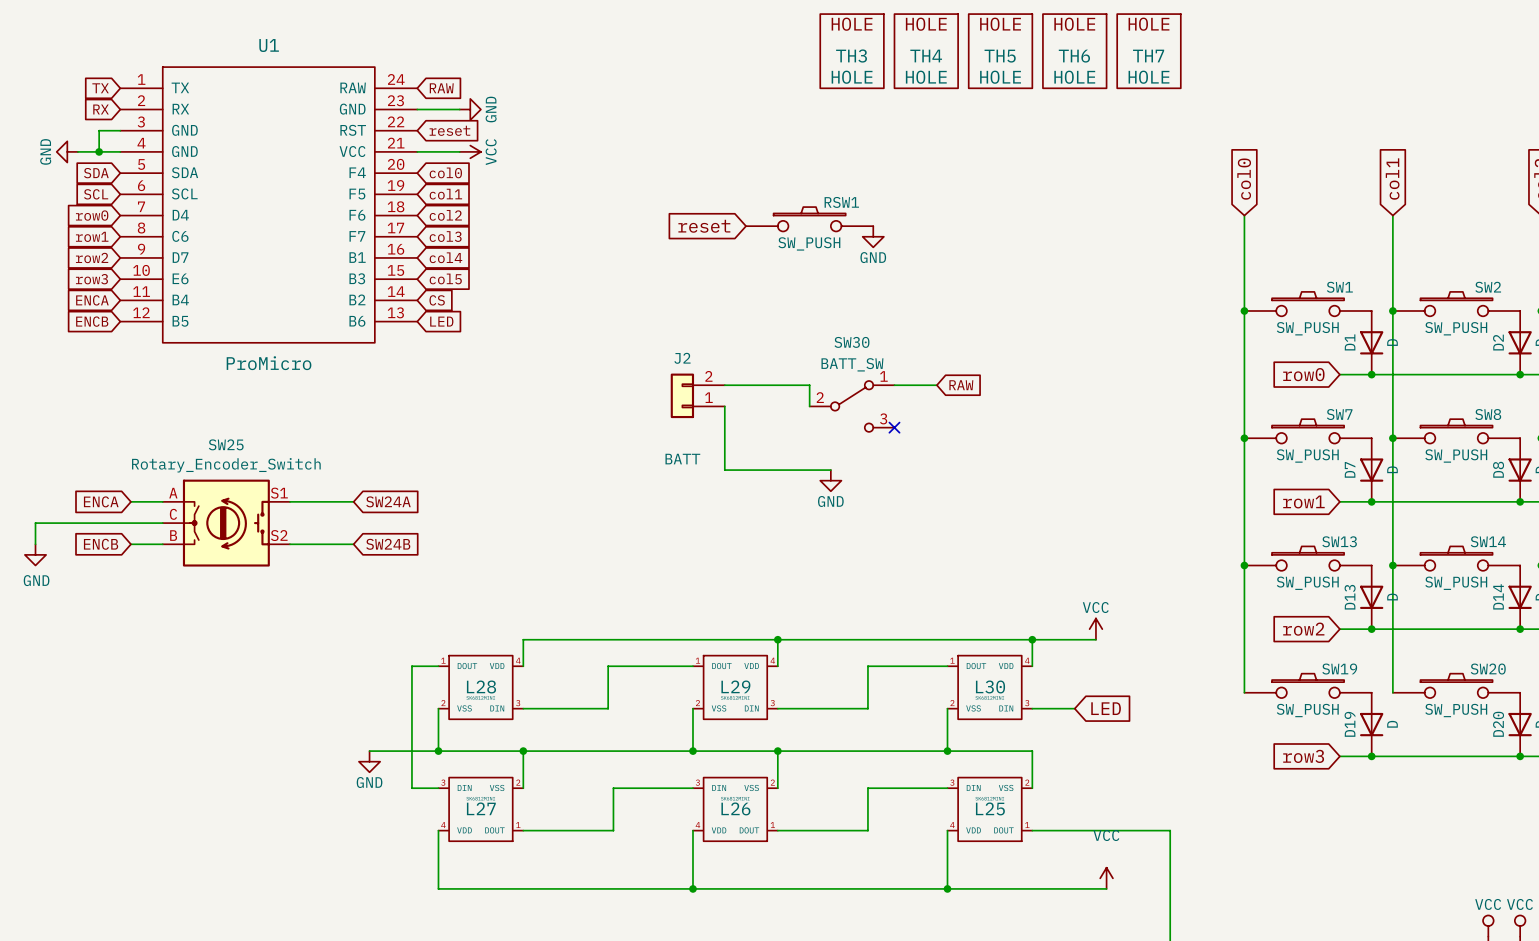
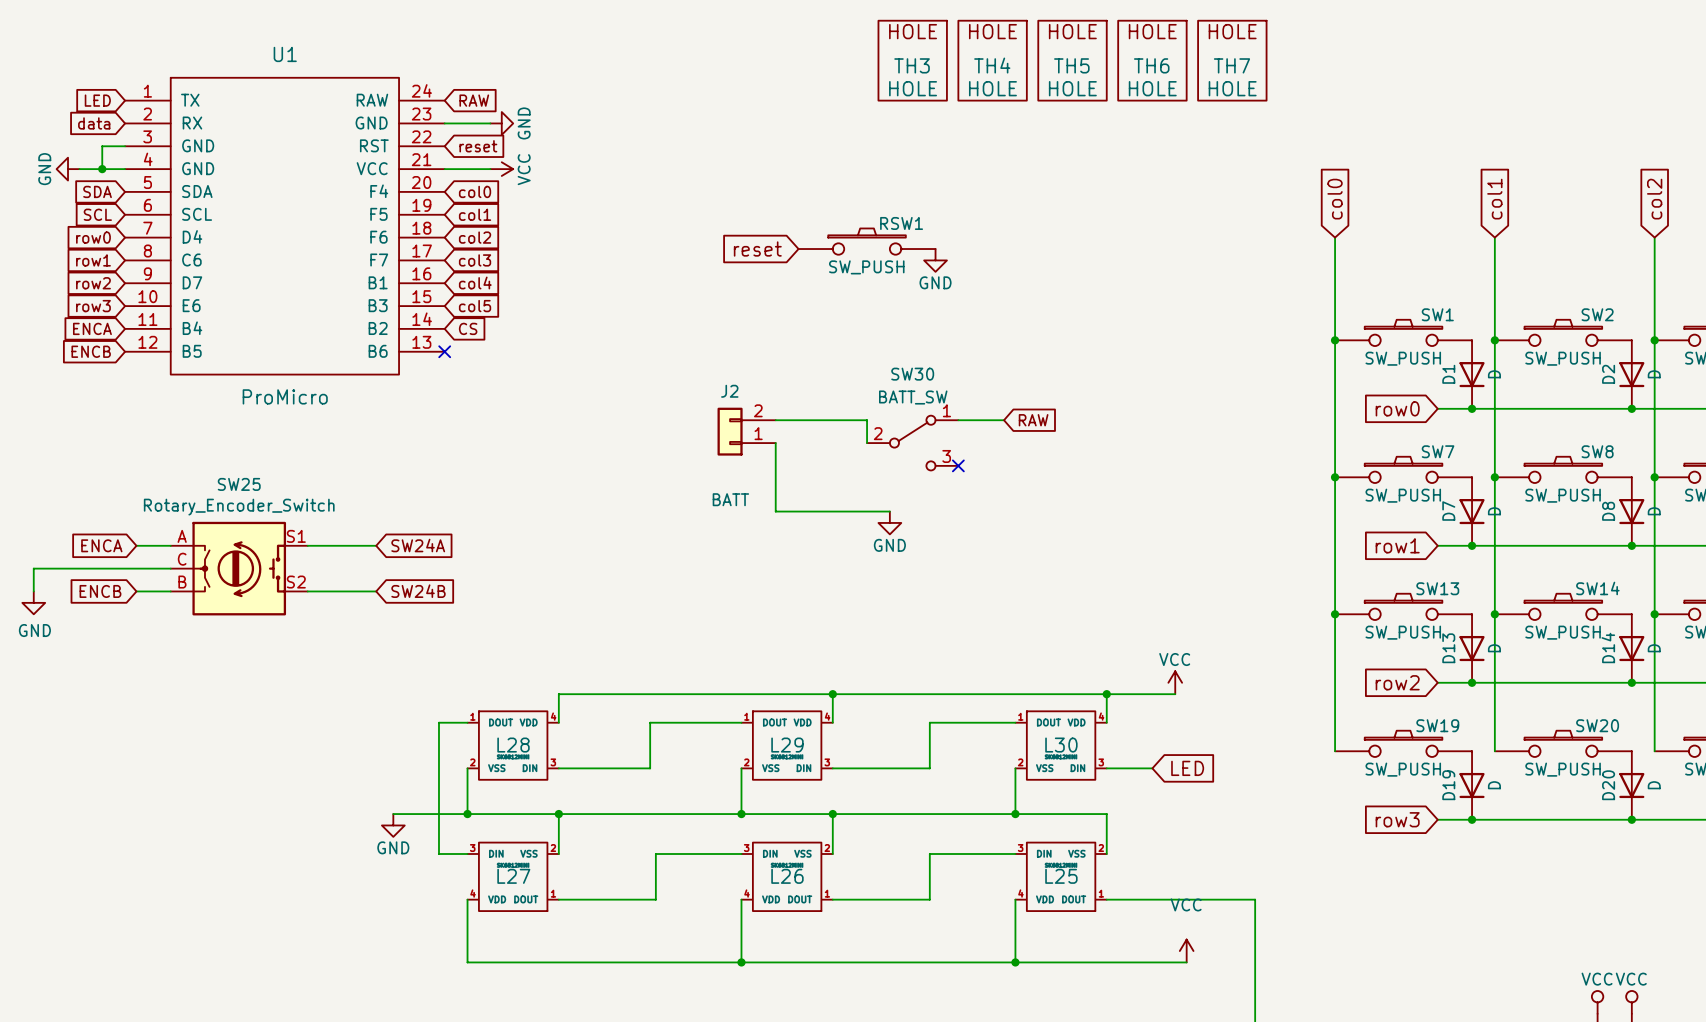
global label: TX (100, 88) -> LED (97, 100)
global label: RX (101, 109) -> data (94, 123)
no-connect mark: none -> (444, 351)
global label: LED (441, 321) -> none

